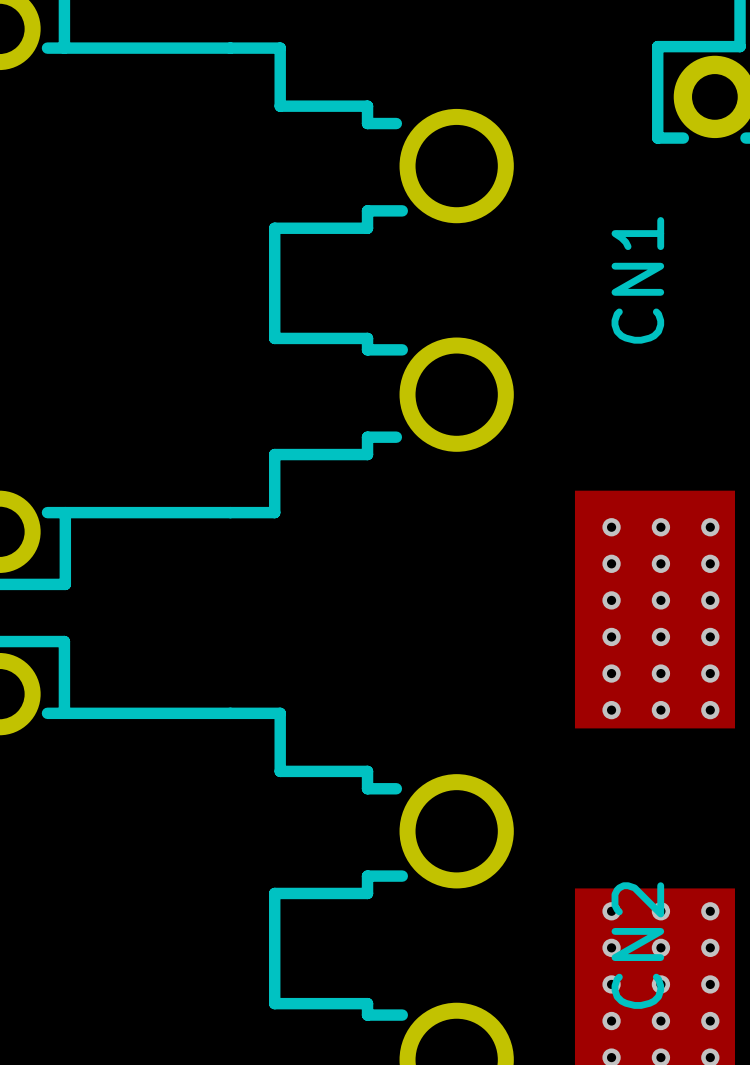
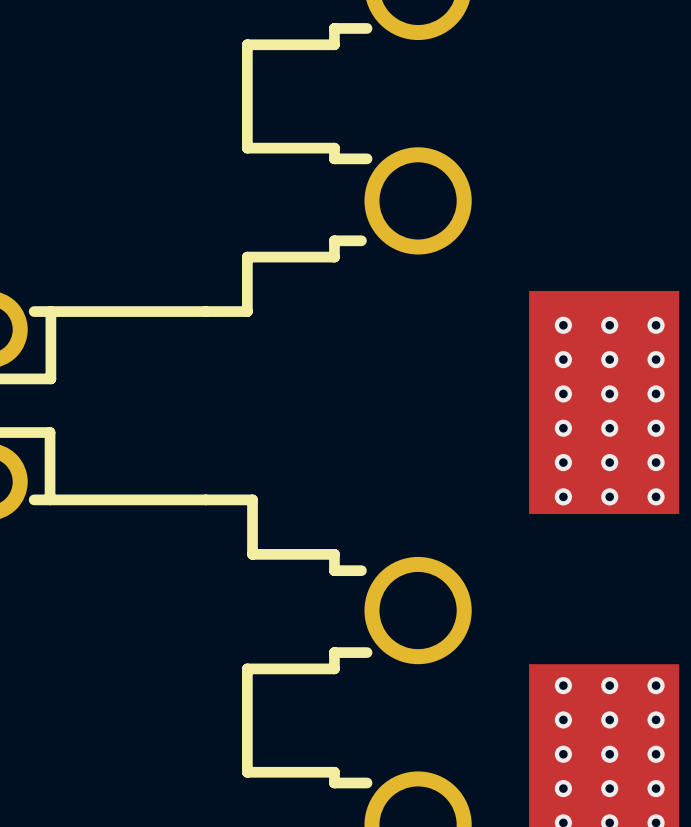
CN1 name: CN1 (637, 280) -> none
CN2 name: CN2 (637, 945) -> none

